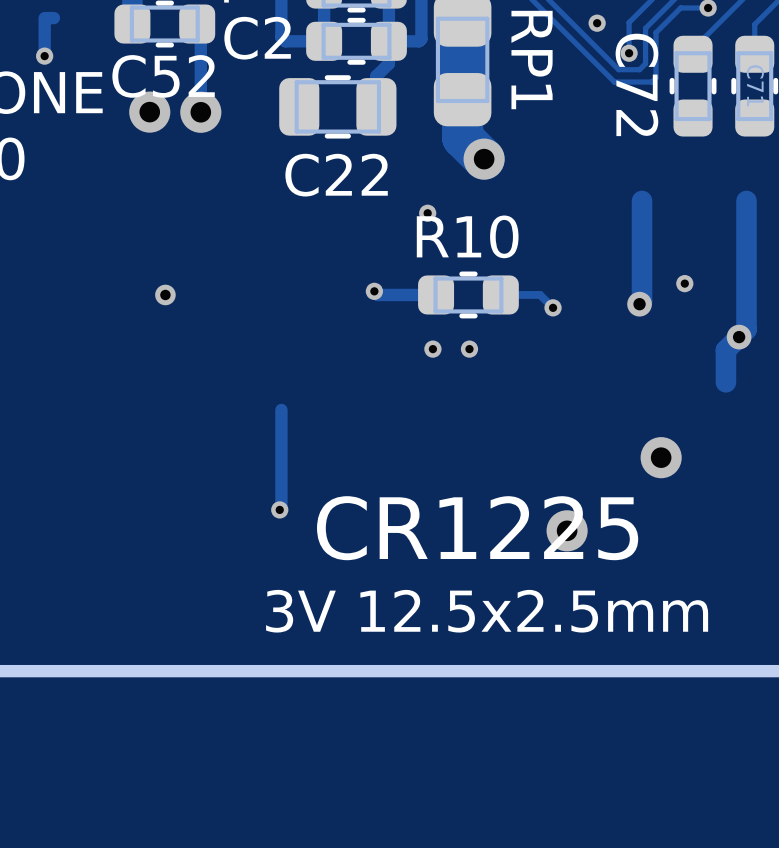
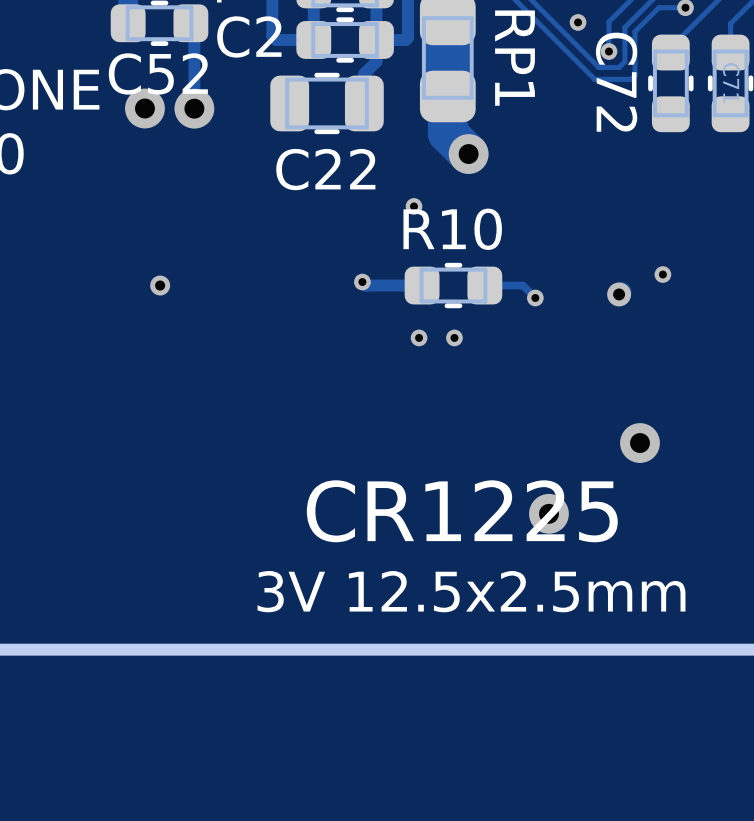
track: (44, 18) (44, 56) -> none
track: (53, 18) (47, 18) -> none
via: (44, 56) -> none
track: (642, 200) (642, 301) -> none
track: (746, 200) (746, 329) (725, 350) (725, 382) -> none
via: (739, 337) -> none
track: (281, 409) (281, 508) (279, 509) -> none
via: (279, 509) -> none

